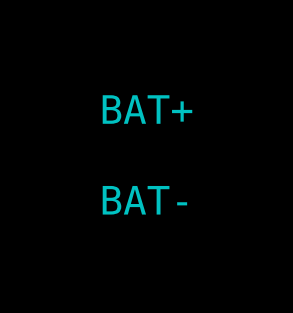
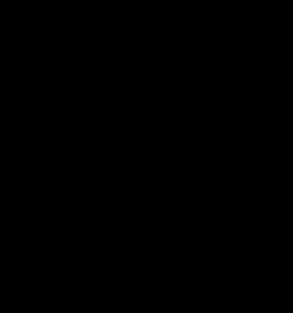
text: BAT+ (147, 109) -> none
text: BAT- (144, 200) -> none

